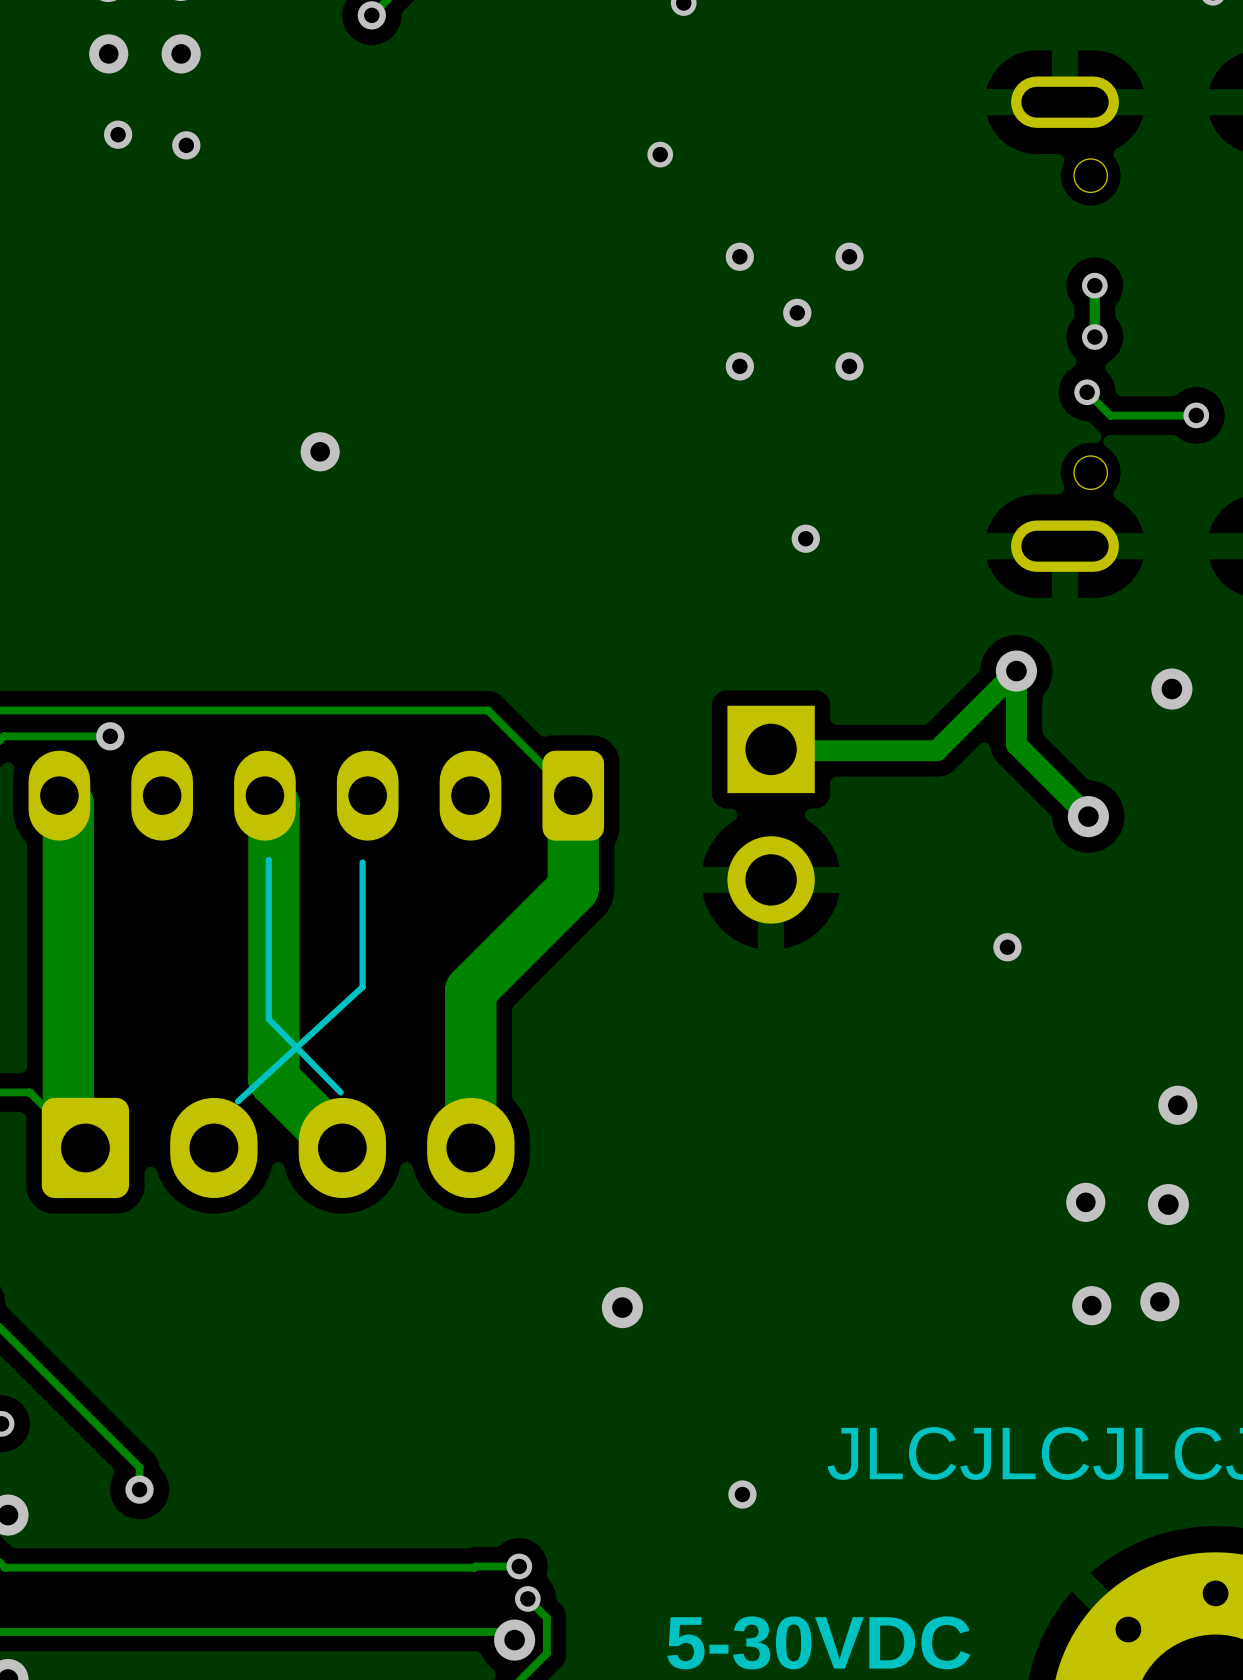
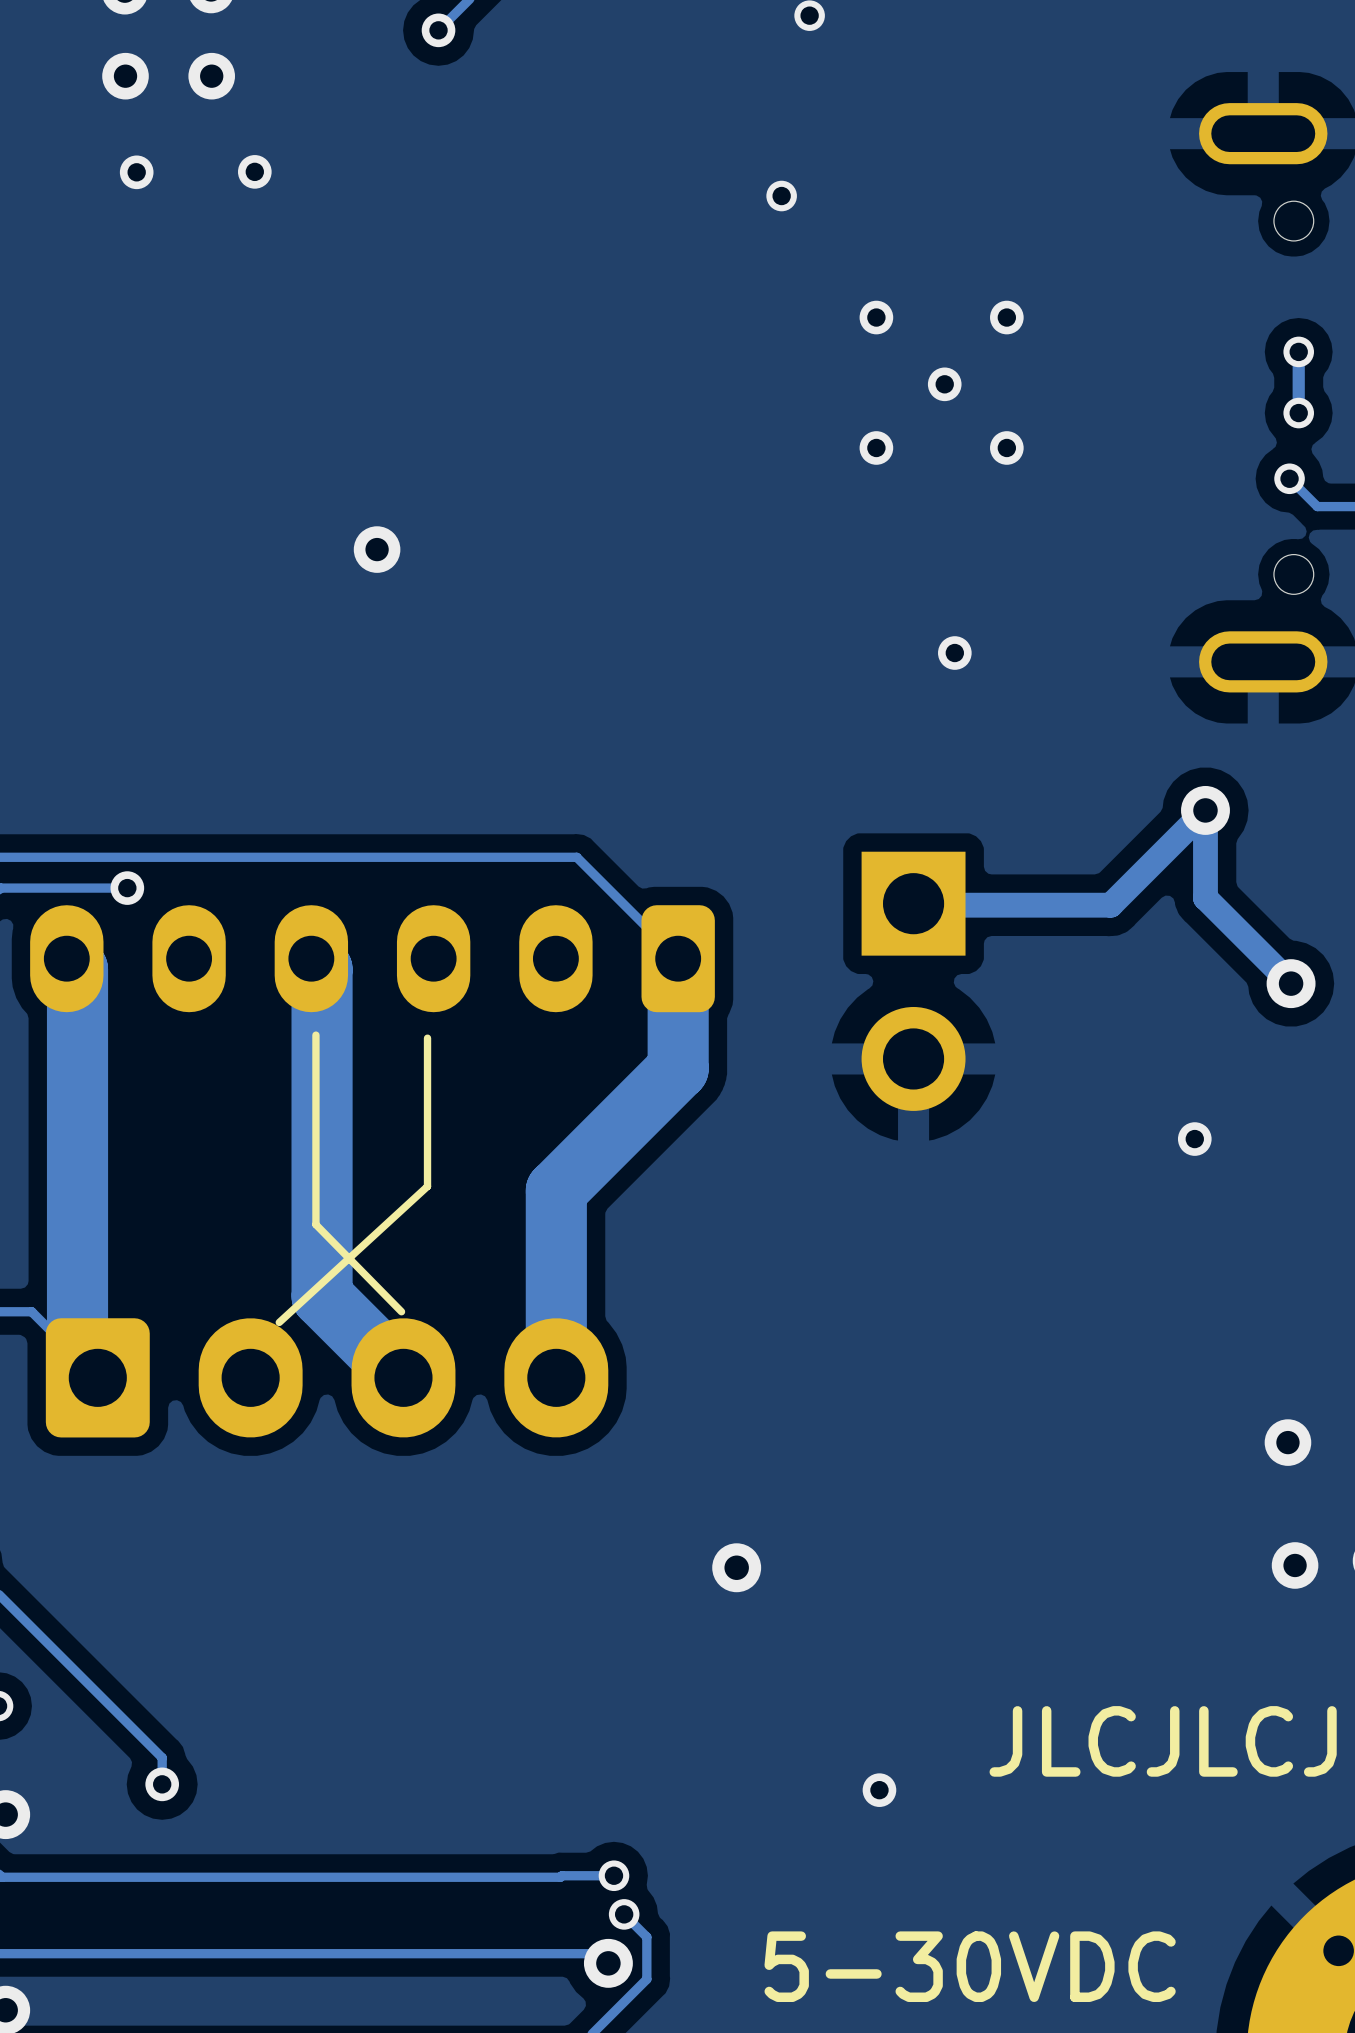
via position: (186, 145) -> (254, 171)

